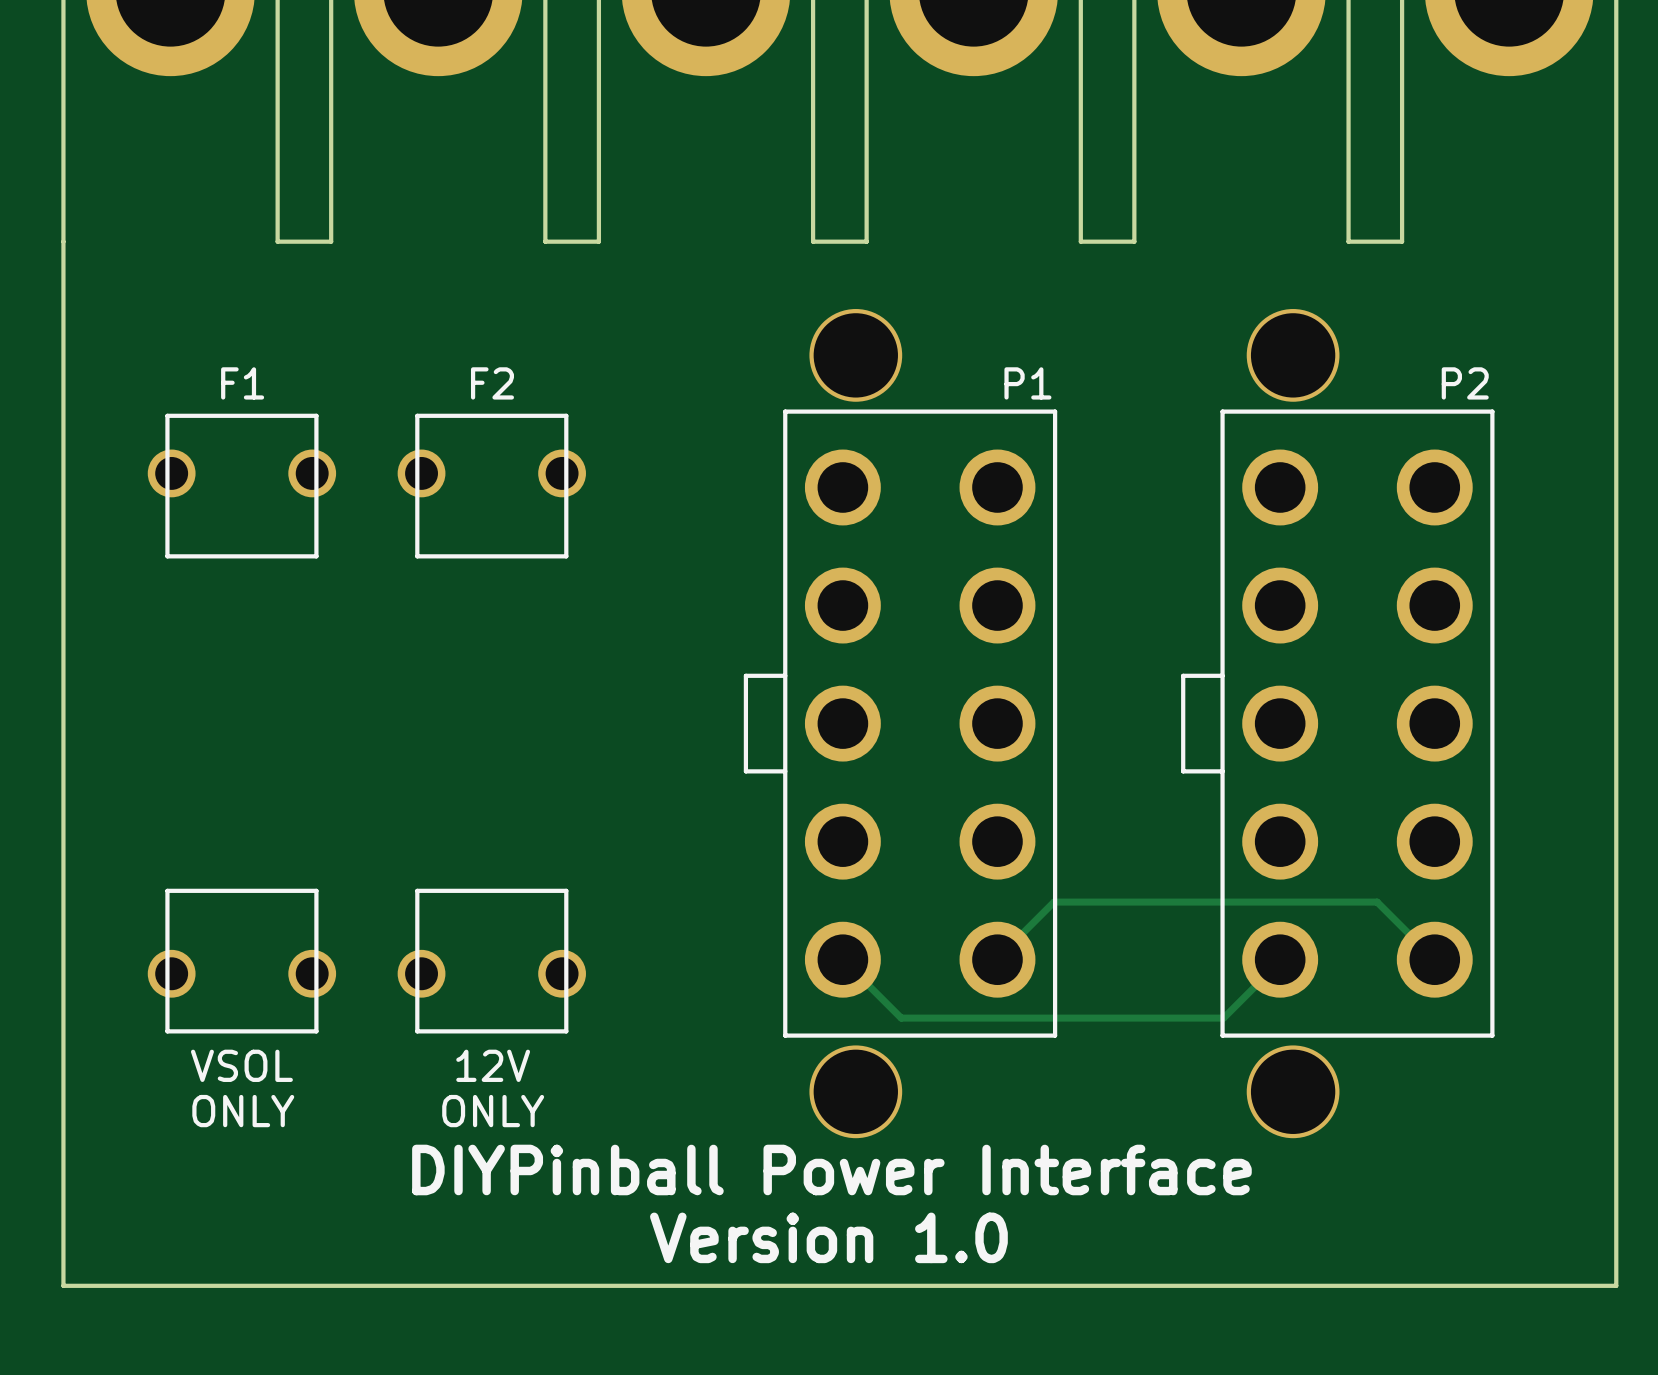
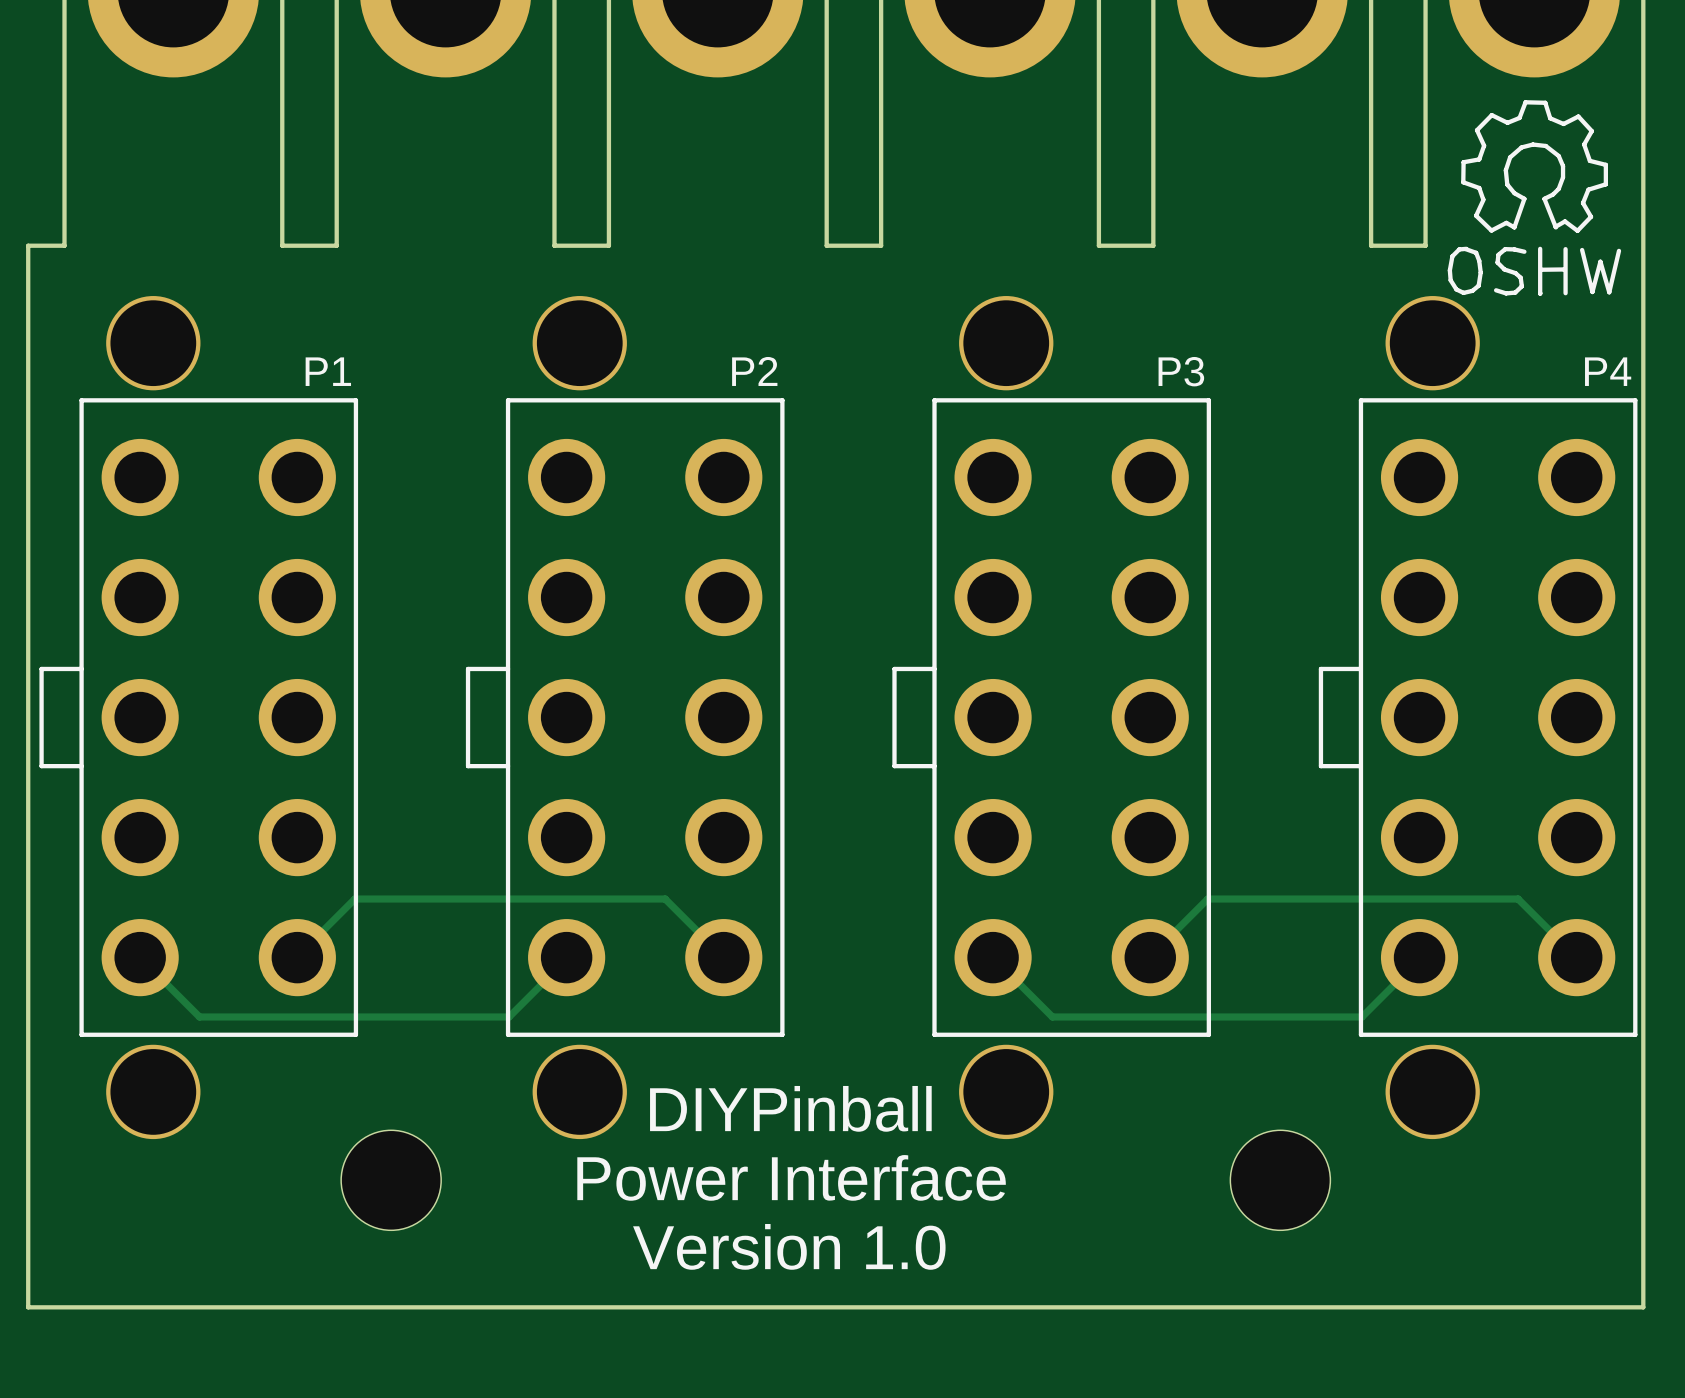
drawing: none -> [1447, 100, 1622, 296]
board edge: (63, 241) (63, 1285) -> (64, 245) (28, 245) (28, 1307) (64, 1307)
P3: none -> (1051, 717)
P4: none -> (1478, 717)
F1: (241, 723) -> none
F2: (491, 723) -> none
P1 position: (900, 723) -> (198, 717)
P2 position: (1337, 723) -> (625, 717)
track: none -> (140, 957) (199, 1016) (509, 1016) (566, 957)
track: none -> (297, 957) (354, 899) (665, 899) (723, 957)
track: none -> (994, 957) (993, 957) (1052, 1016) (1362, 1016) (1419, 957)
track: none -> (1150, 957) (1207, 899) (1518, 899) (1576, 957)
track: (842, 959) (901, 1018) (1223, 1018) (1280, 959) -> none
track: (997, 959) (1054, 902) (1377, 902) (1434, 959) -> none
text: VSOL (241, 1065) -> none
text: 12V (493, 1065) -> none
text: none -> DIYPinball (790, 1108)
text: ONLY (243, 1111) -> none
text: ONLY (493, 1111) -> none
part: none -> (391, 1180)
part: none -> (1280, 1180)
text: DIYPinball Power Interface (831, 1169) -> Power Interface (791, 1177)
text position: Version 1.0 (828, 1237) -> Version 1.0 (789, 1246)

